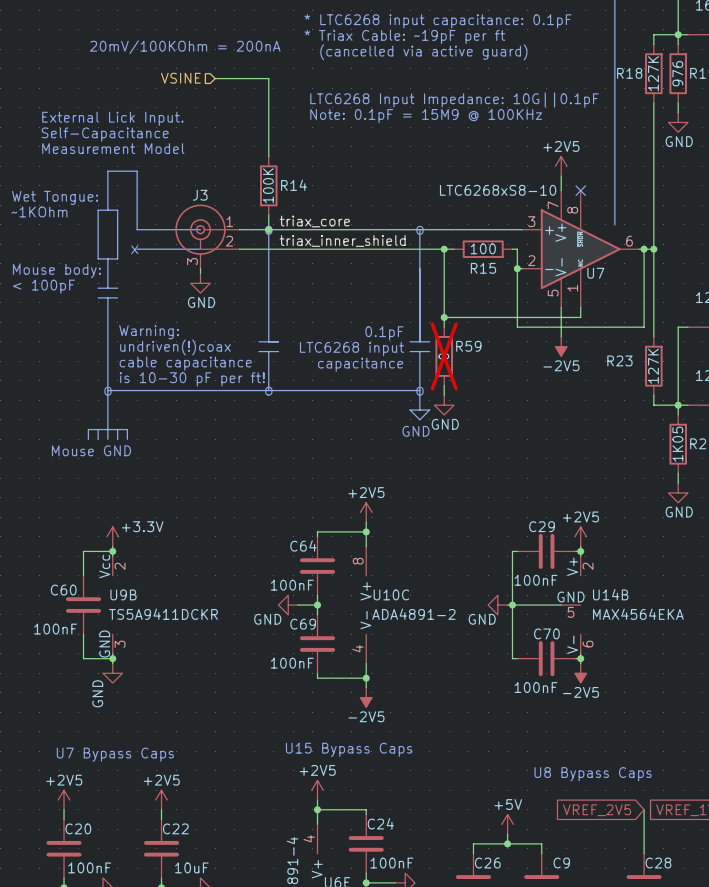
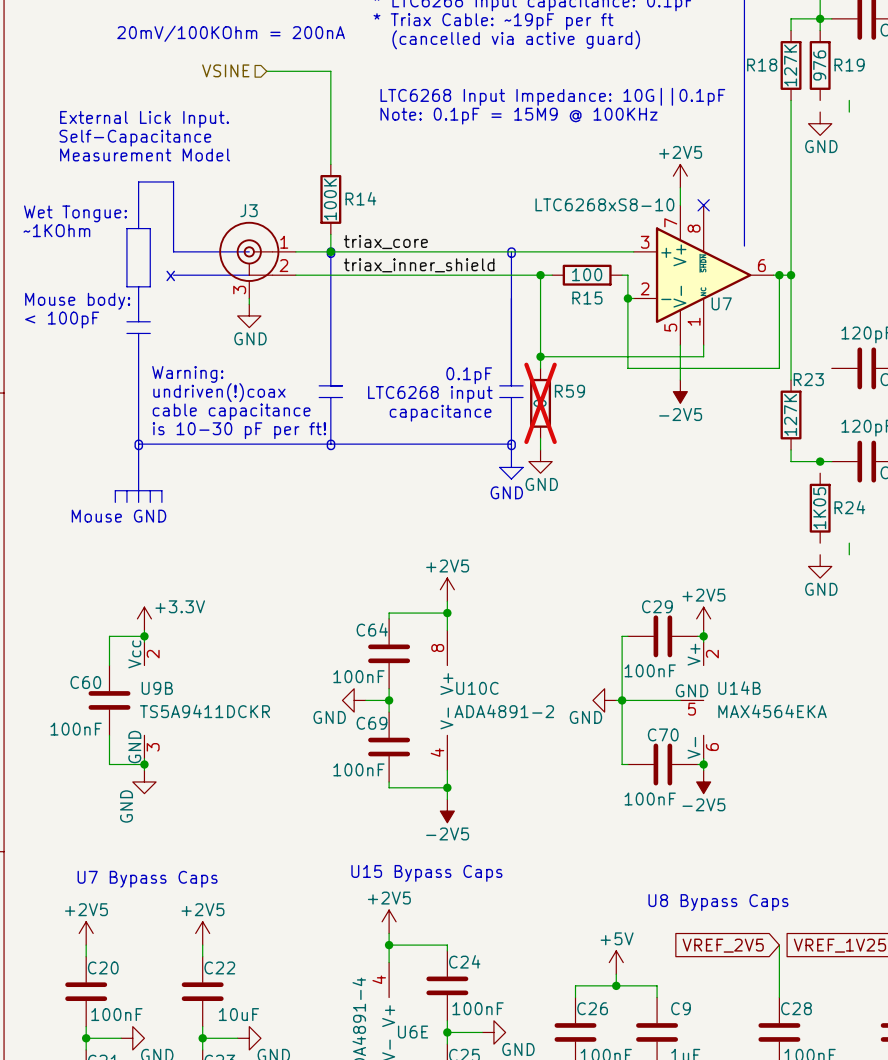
wire: (678, 102) (678, 112) -> (849, 100) (849, 112)
wire: (687, 327) (678, 327) (678, 414) -> none
R23 name position: R23 (619, 360) -> R23 (808, 379)
wire: (678, 473) (678, 483) -> (849, 543) (849, 554)

